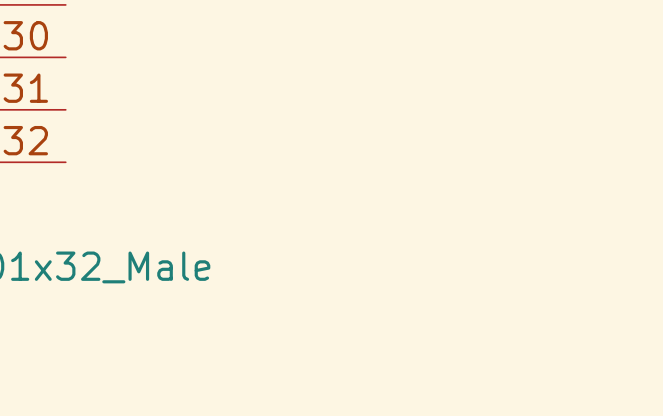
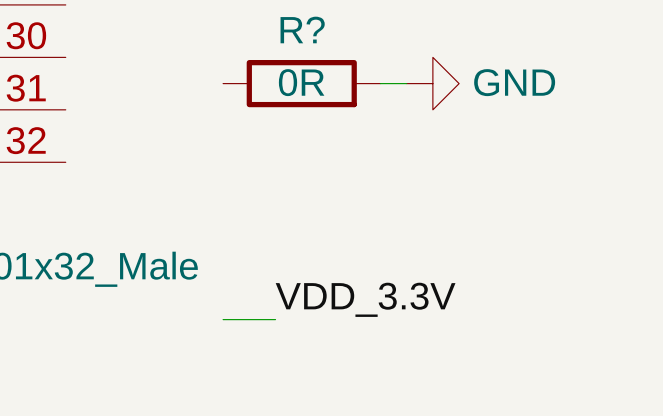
R?: none -> 0R (301, 83)
wire: none -> (380, 83) (406, 83)
power symbol: none -> GND (432, 83)
label: none -> VDD_3.3V (365, 299)
wire: none -> (223, 319) (275, 319)

